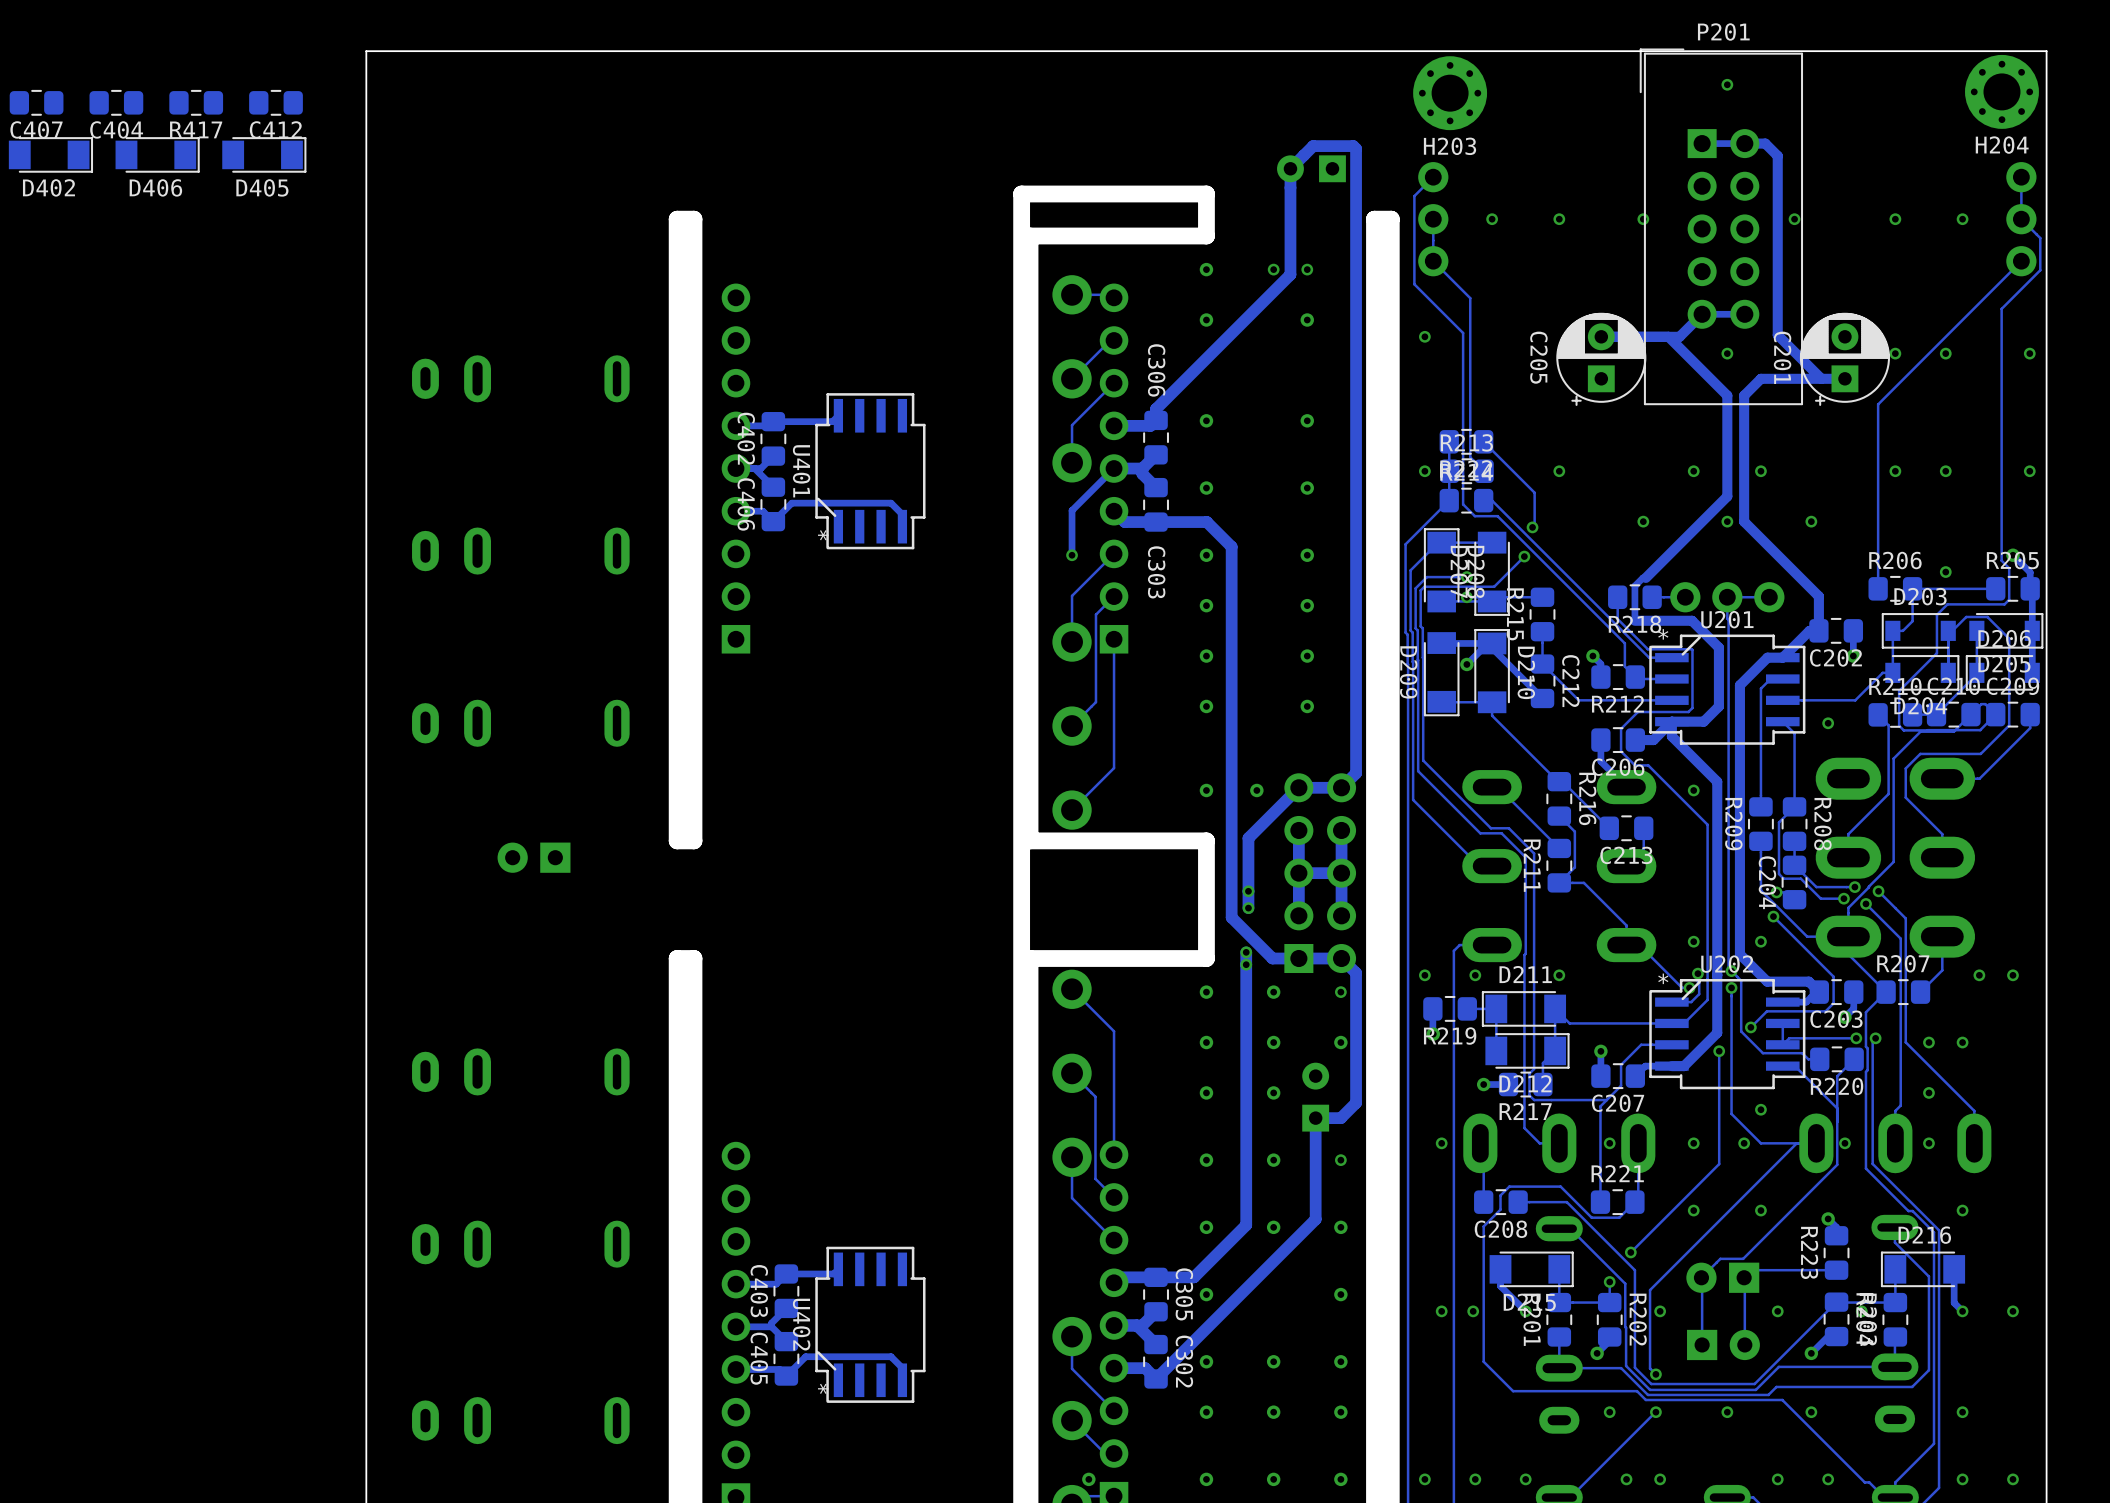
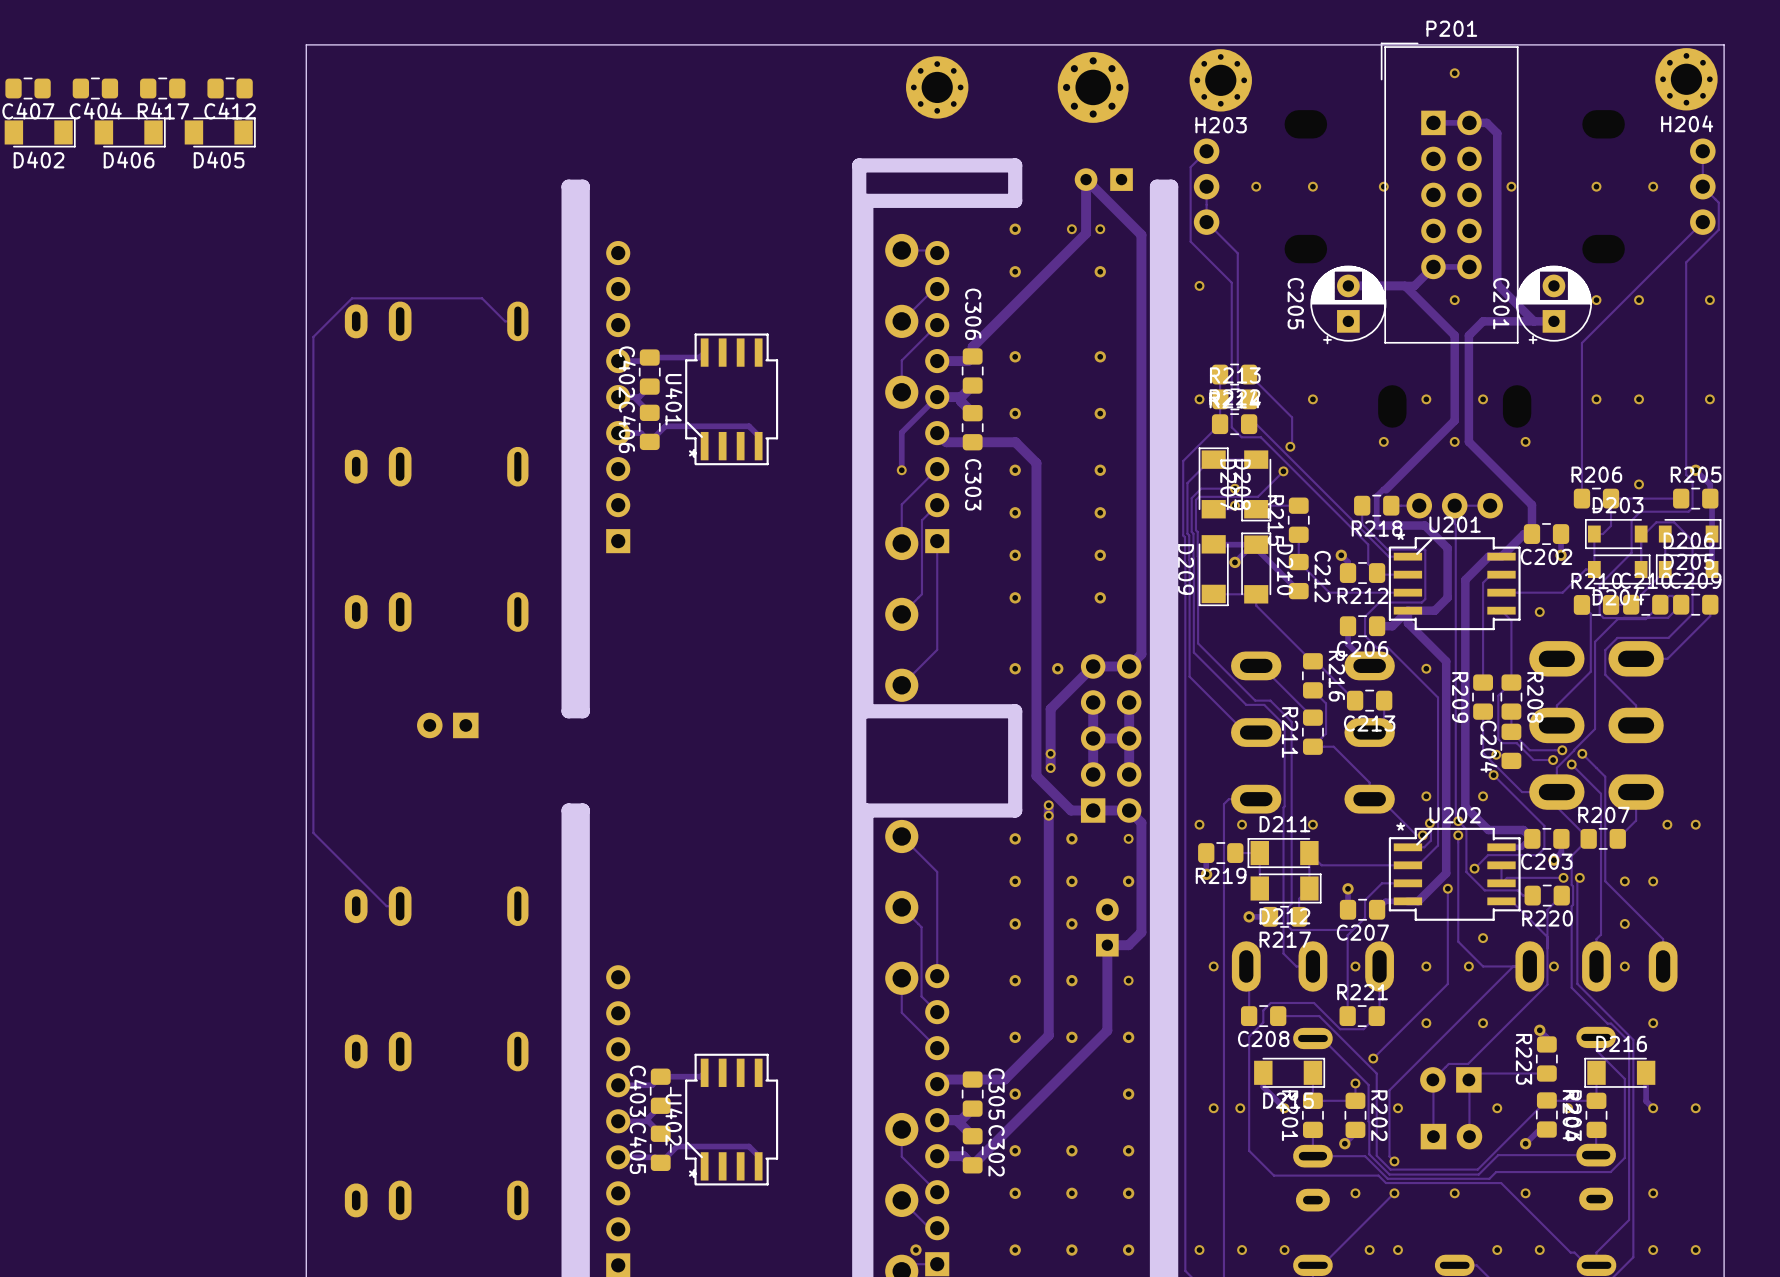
part: none -> (937, 87)
part: none -> (1093, 87)
part position: (1311, 168) -> (1103, 179)
track: (1290, 210) (1290, 168) (1313, 146) (1353, 146) (1356, 148) (1356, 276) -> (1086, 179) (1141, 234)
track: none -> (517, 321) (505, 321) (482, 298) (352, 298) (313, 336) (313, 832) (386, 906) (400, 906)

